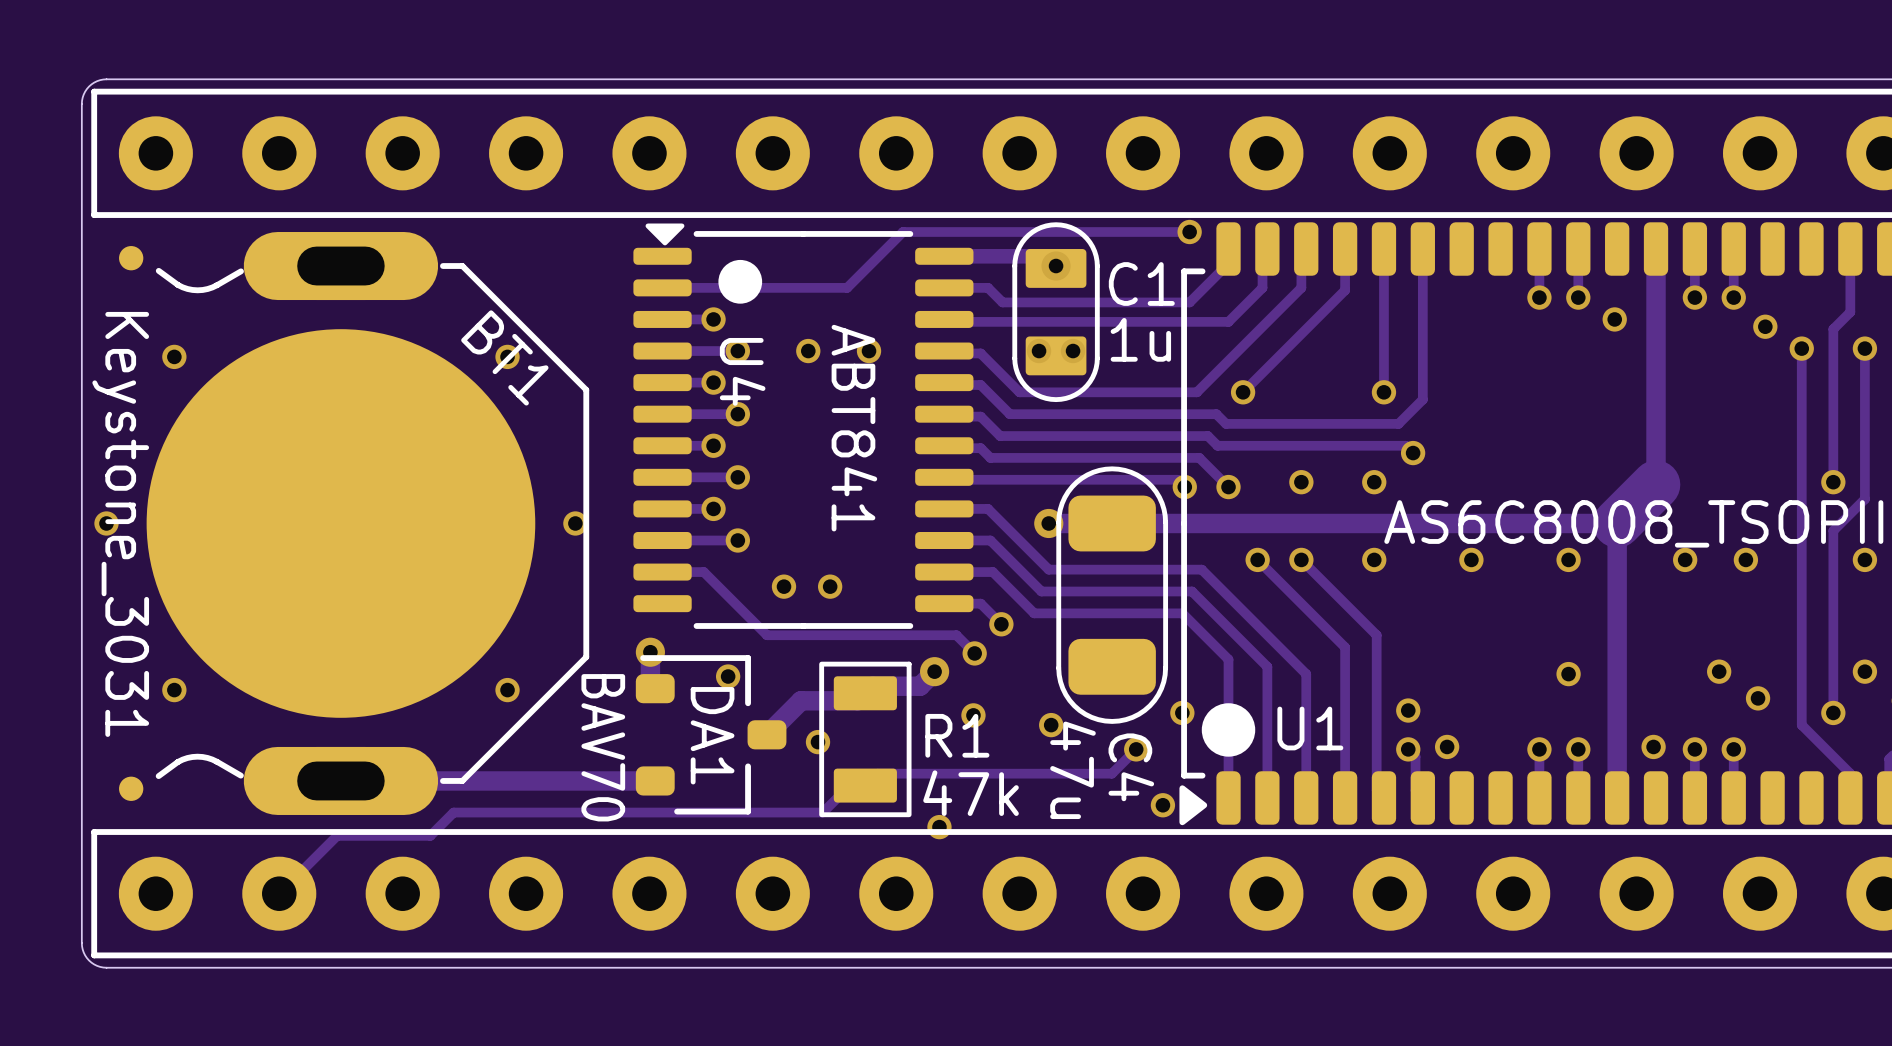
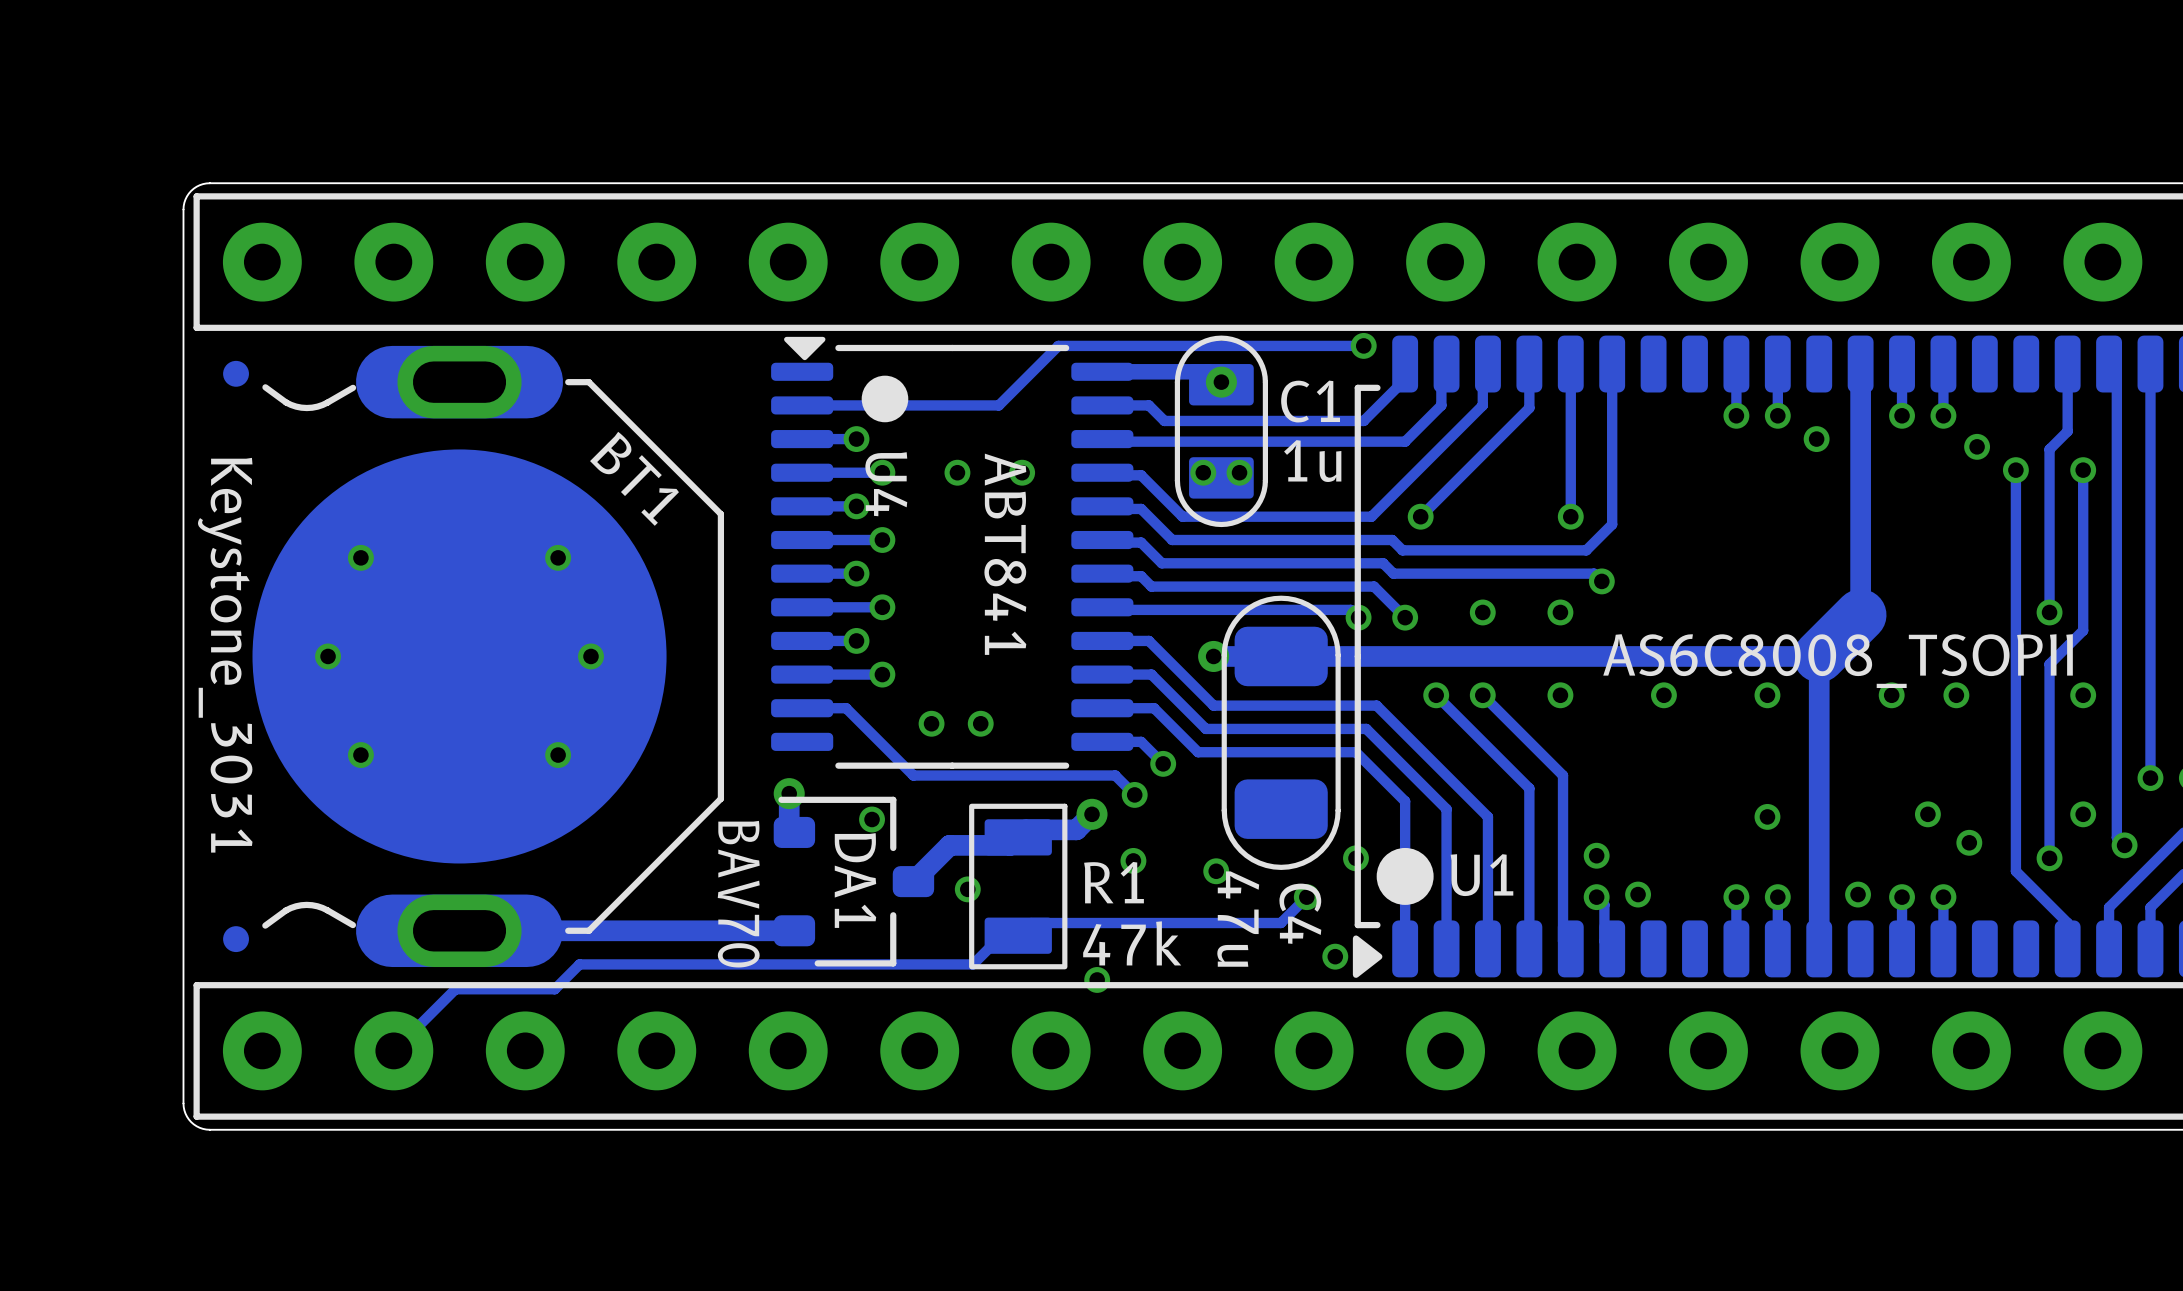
via: (174, 356) -> none
via: (507, 356) -> none
via: none -> (360, 557)
via: none -> (558, 557)
via: (106, 523) -> none
via: none -> (328, 656)
via: none -> (590, 656)
via: (575, 523) -> none
via: none -> (360, 755)
via: none -> (558, 755)
via: (174, 690) -> none
via: (507, 690) -> none

